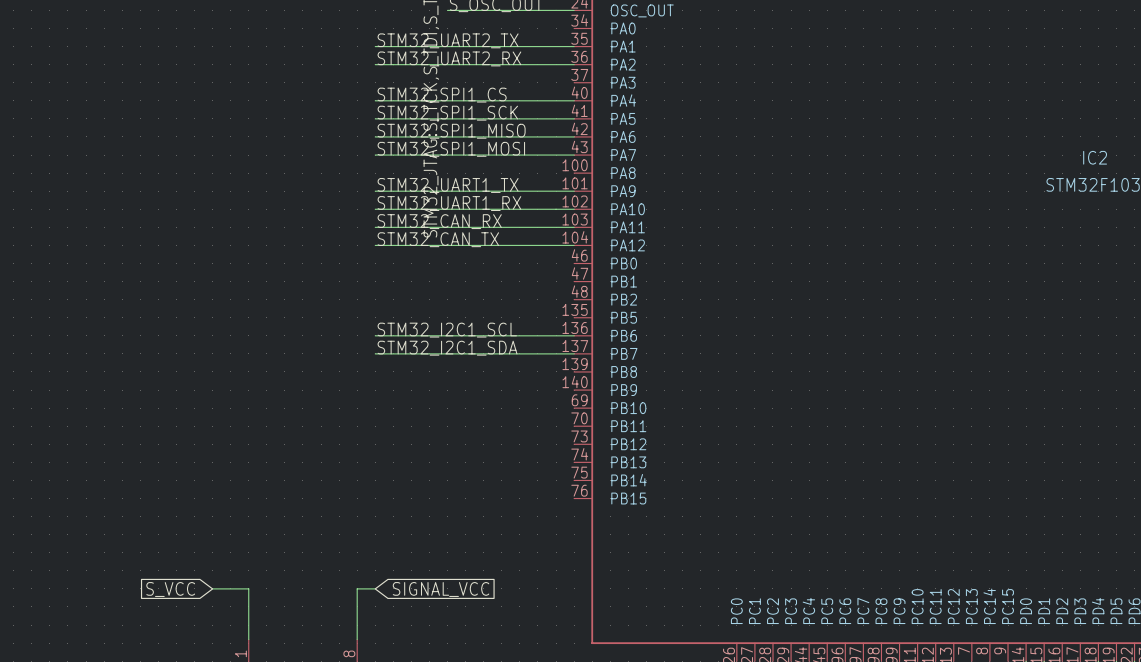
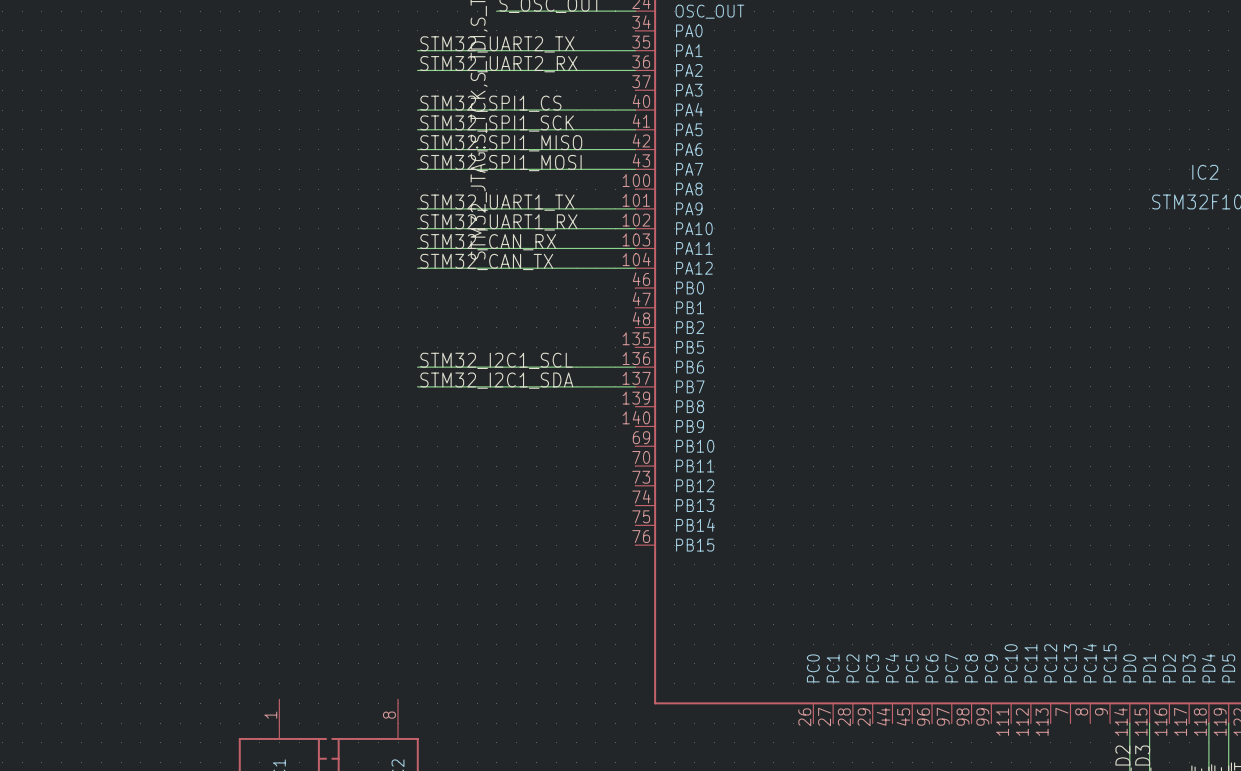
wire: (212, 588) (248, 588) (248, 639) -> none
wire: (375, 588) (357, 588) (357, 639) -> none
global label: S_VCC (170, 589) -> none
global label: SIGNAL_VCC (441, 589) -> none

